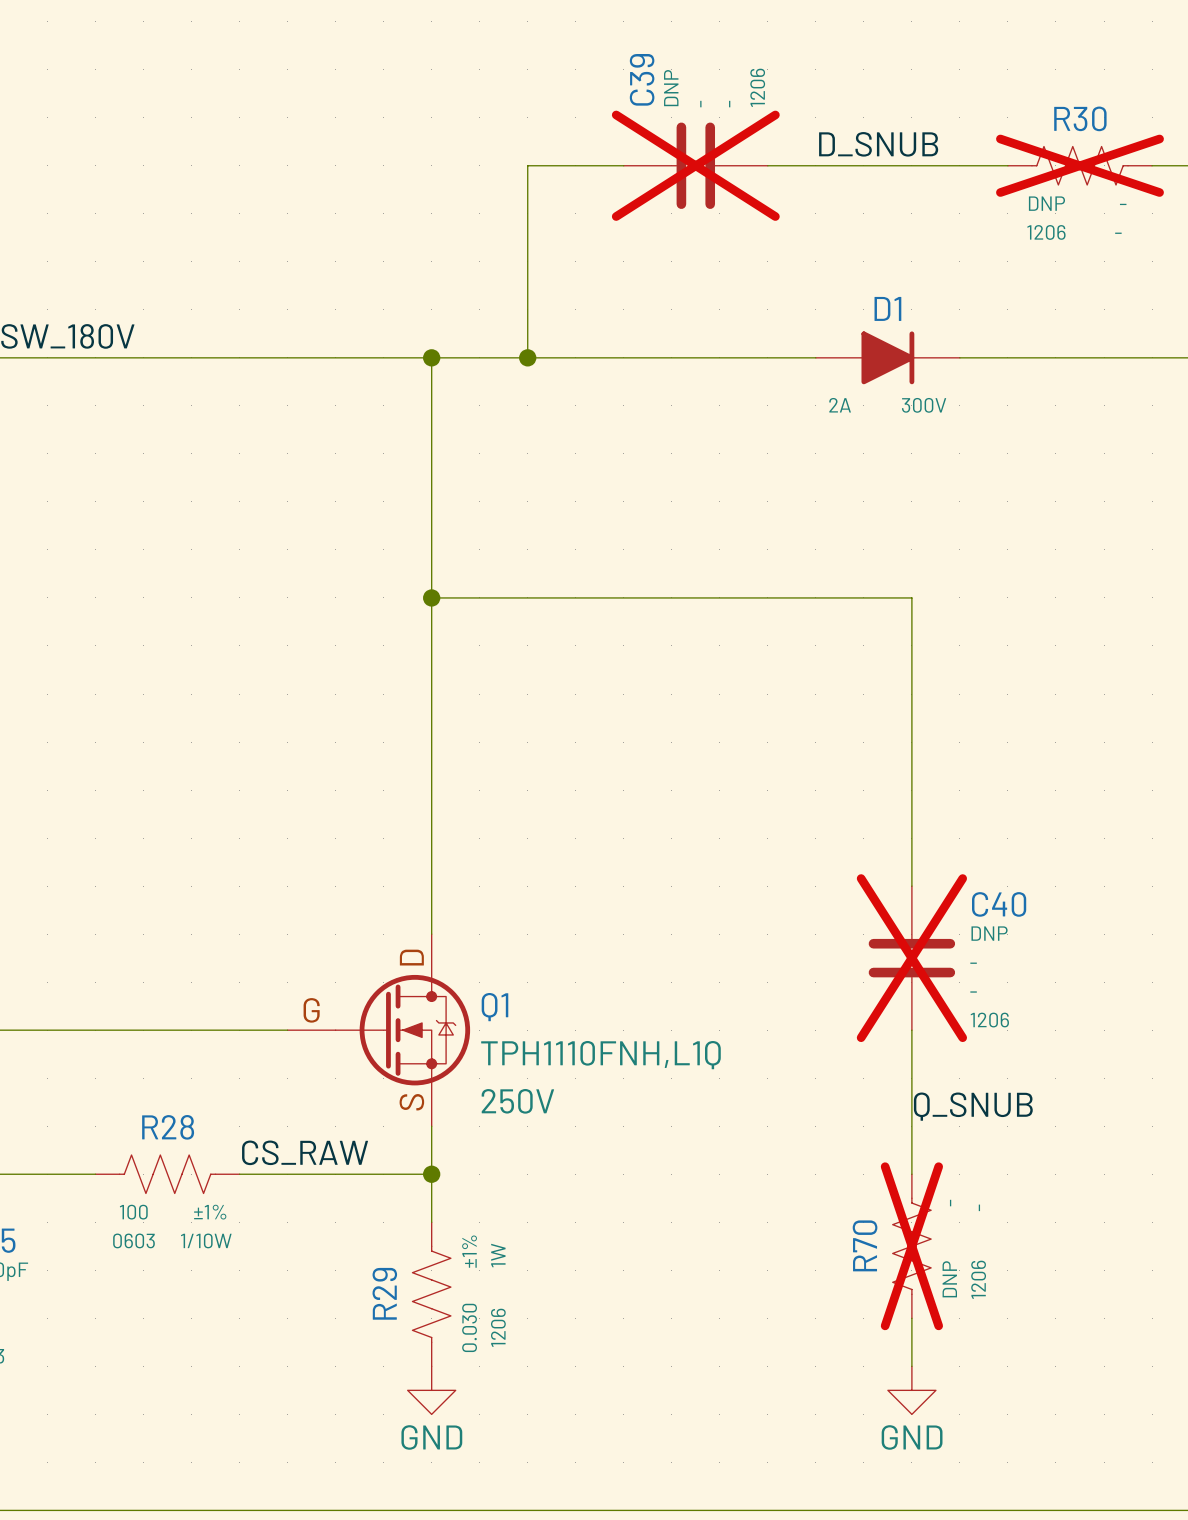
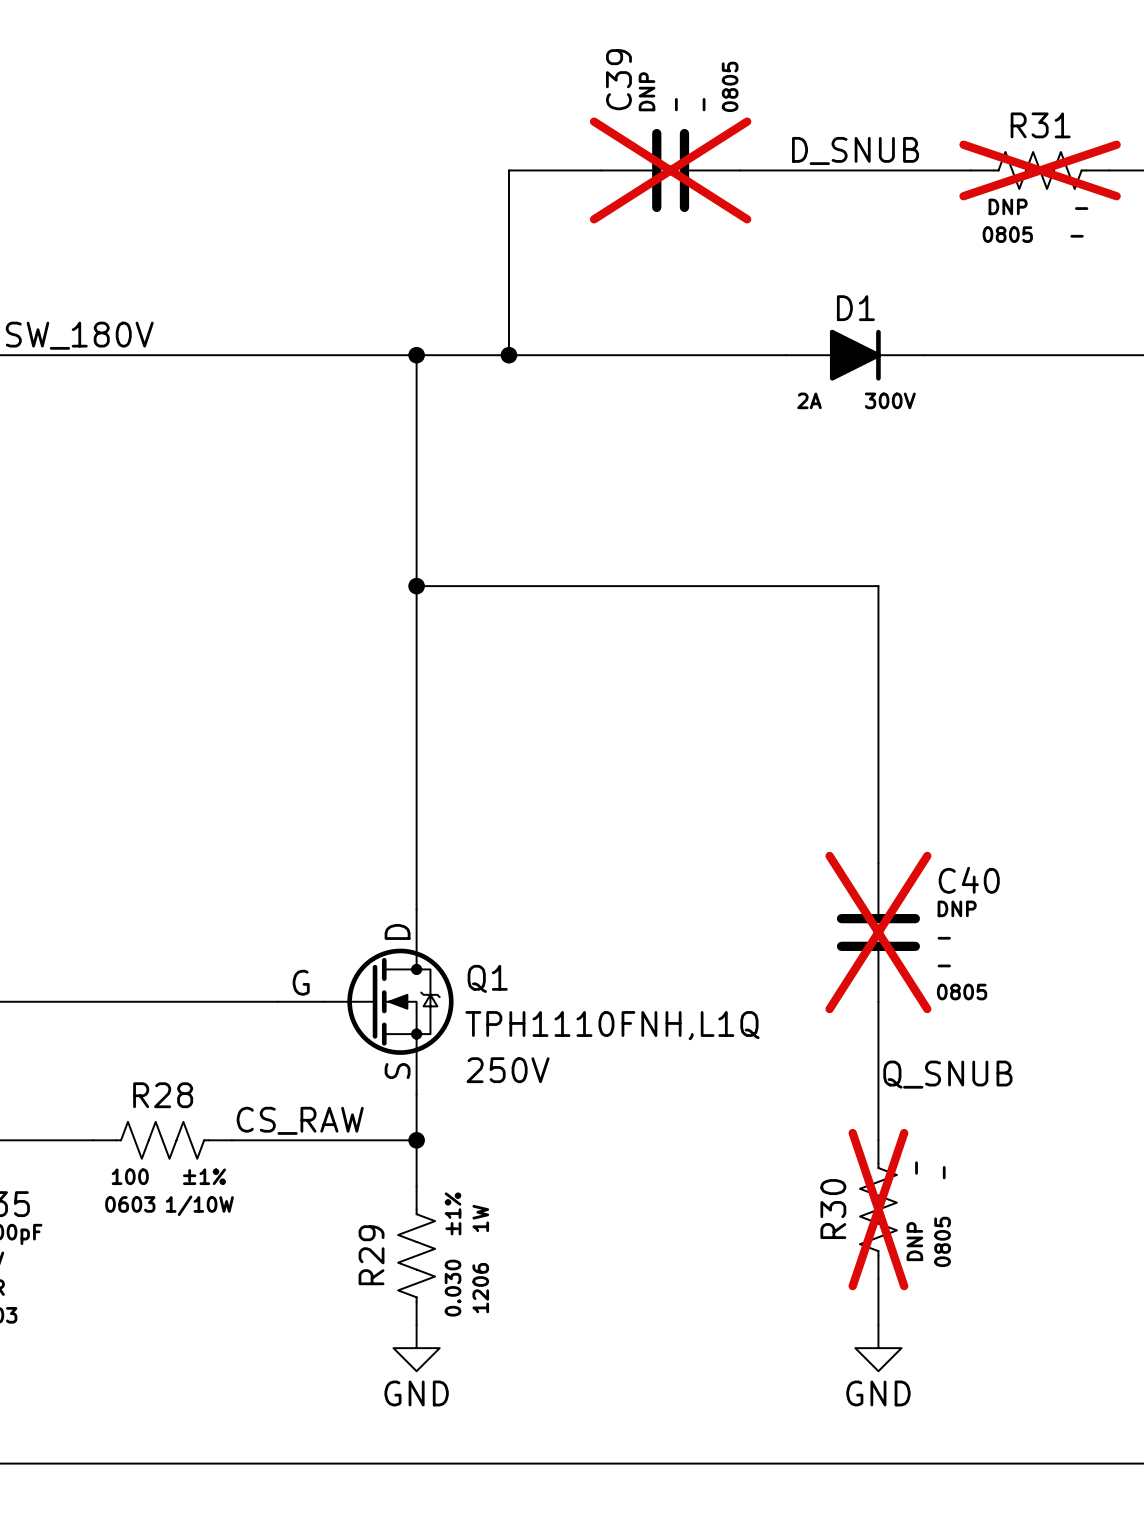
C39 text: 1206 (757, 87) -> 0805 (730, 86)
R30 name: R30 (1080, 118) -> R31 (1040, 125)
R30 text: 1206 (1046, 232) -> 0805 (1007, 234)
C40 text: 1206 (989, 1020) -> 0805 (962, 992)
R70 name: R70 (865, 1245) -> R30 (833, 1209)
R70 text: 1206 (978, 1279) -> 0805 (942, 1241)

